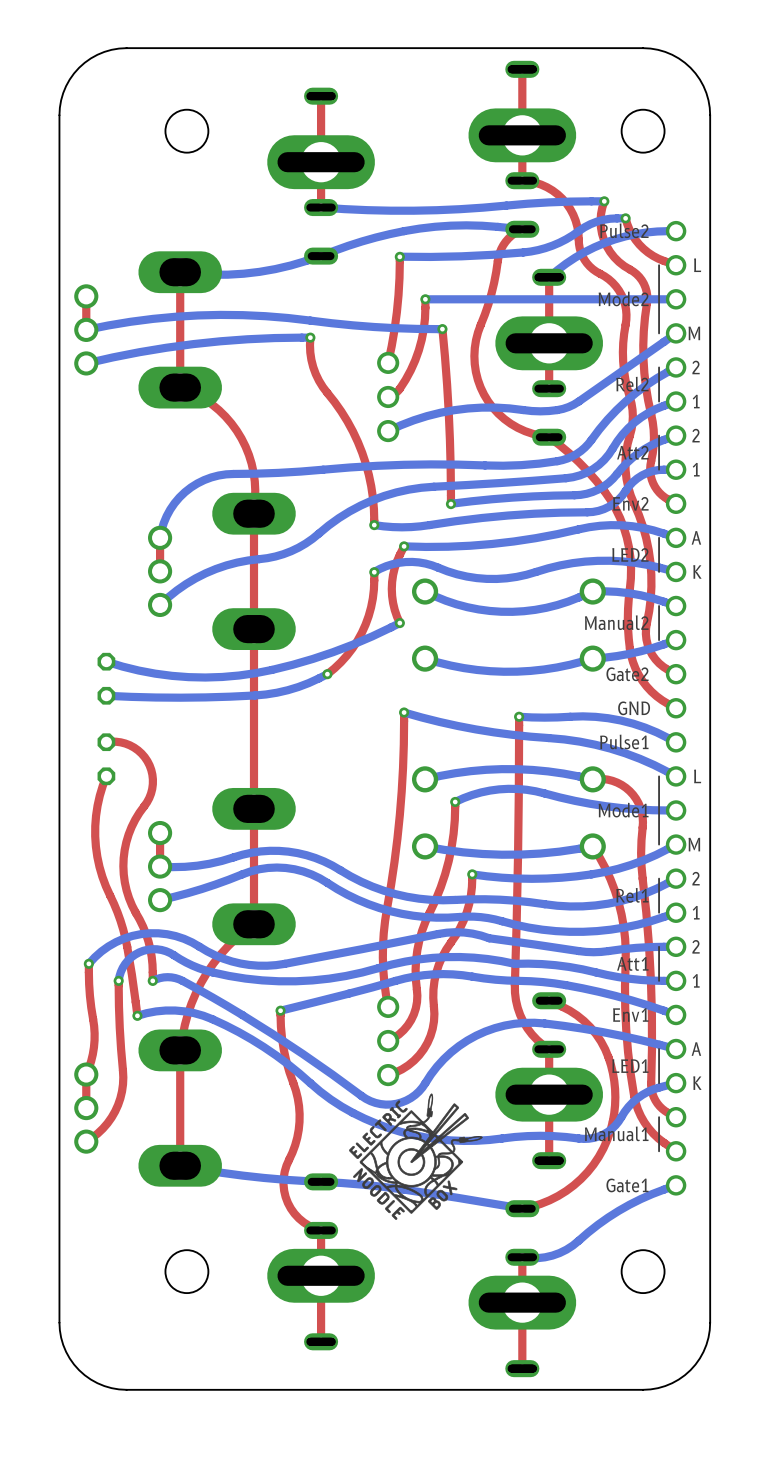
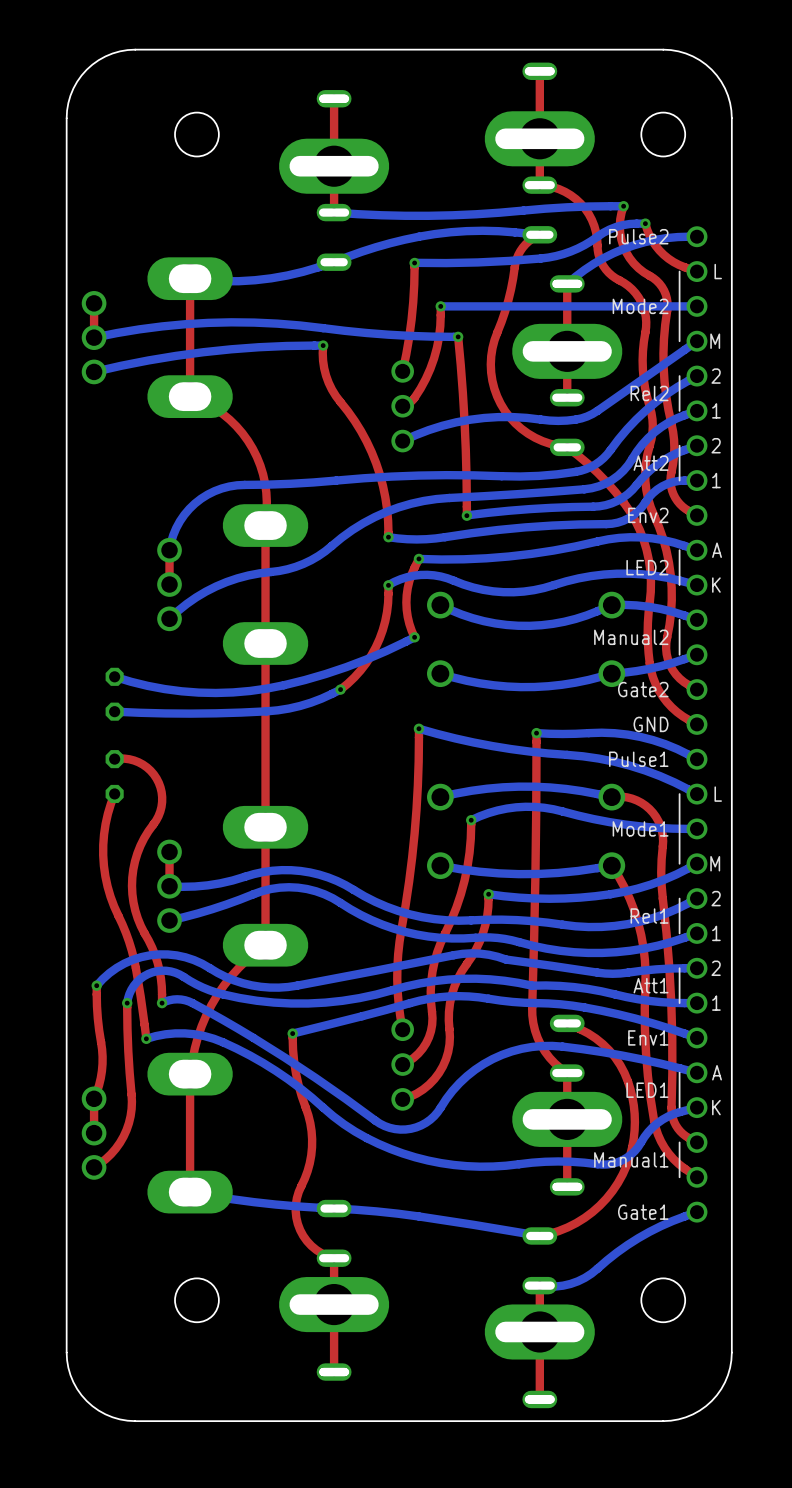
drawing: [349, 1093, 483, 1220] -> none

